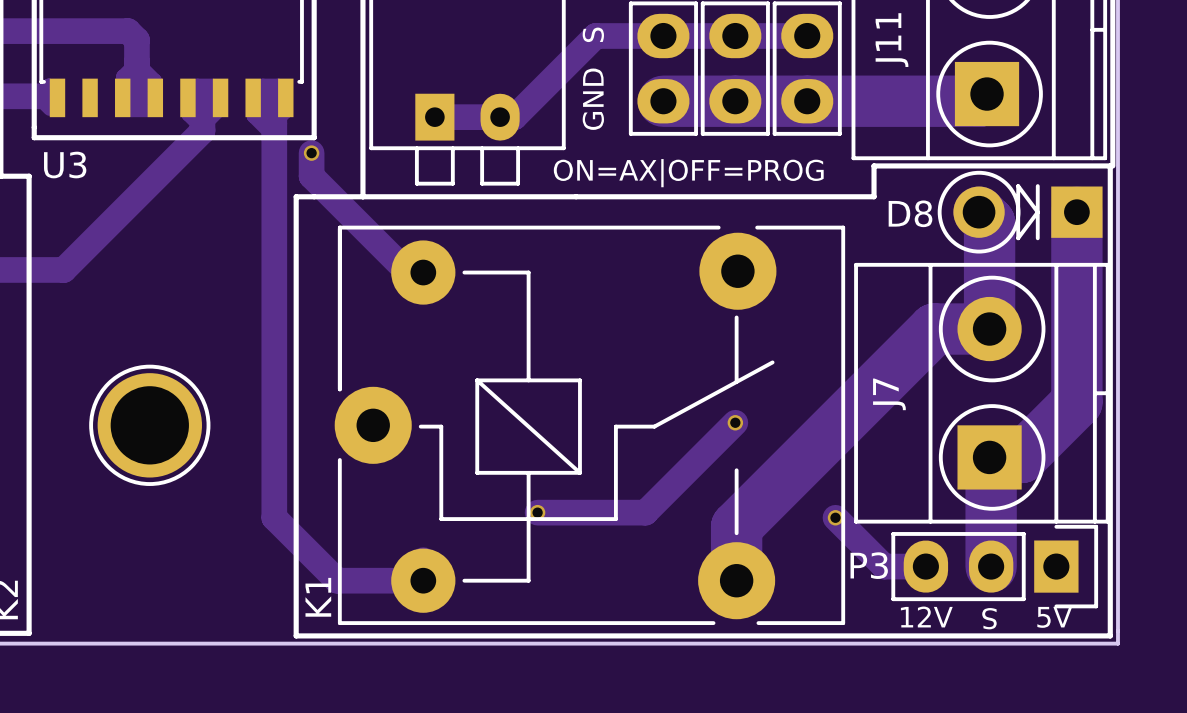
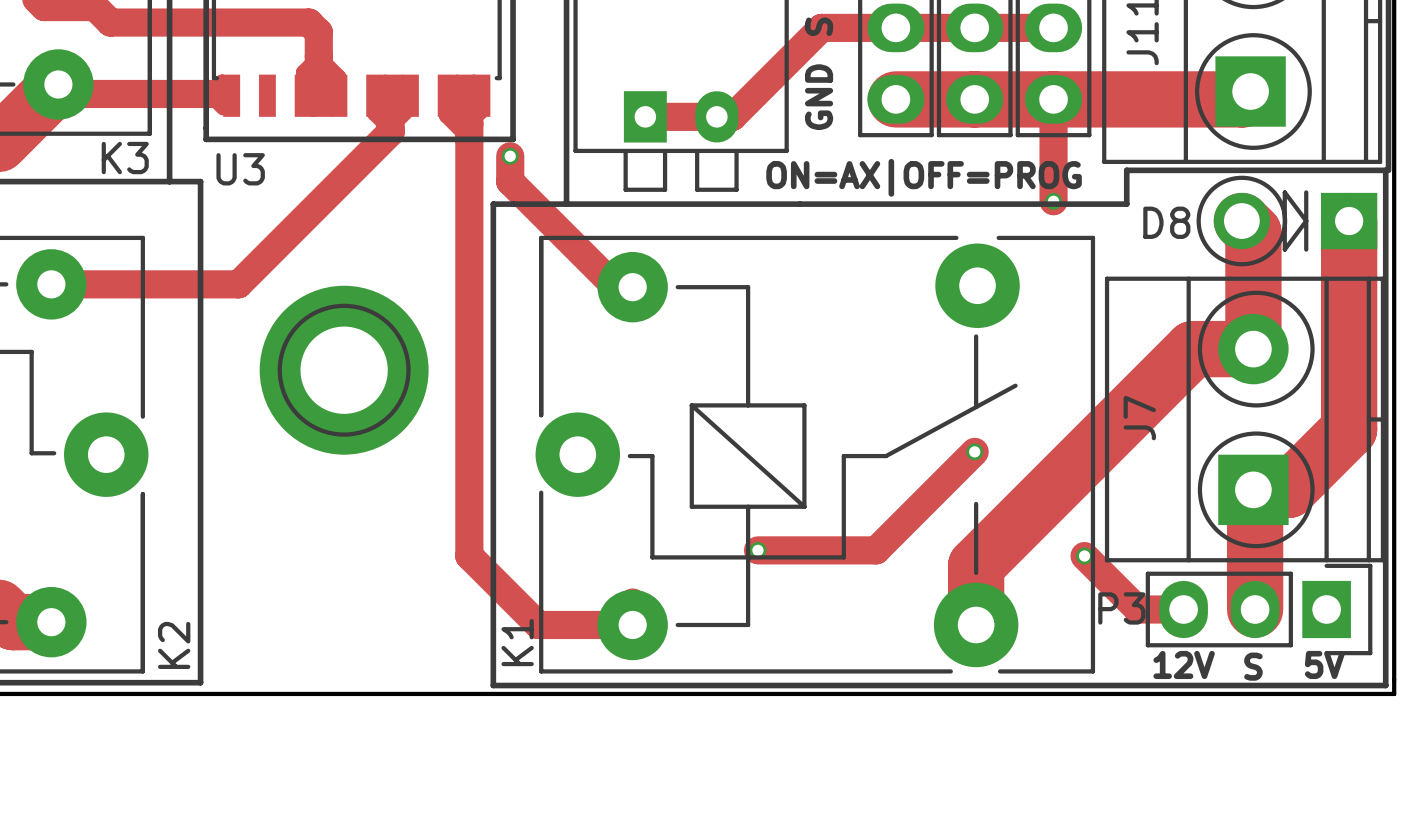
track: none -> (1053, 99) (1053, 201)
via: none -> (1053, 201)
part: none -> (344, 370)
part: (149, 425) -> none

